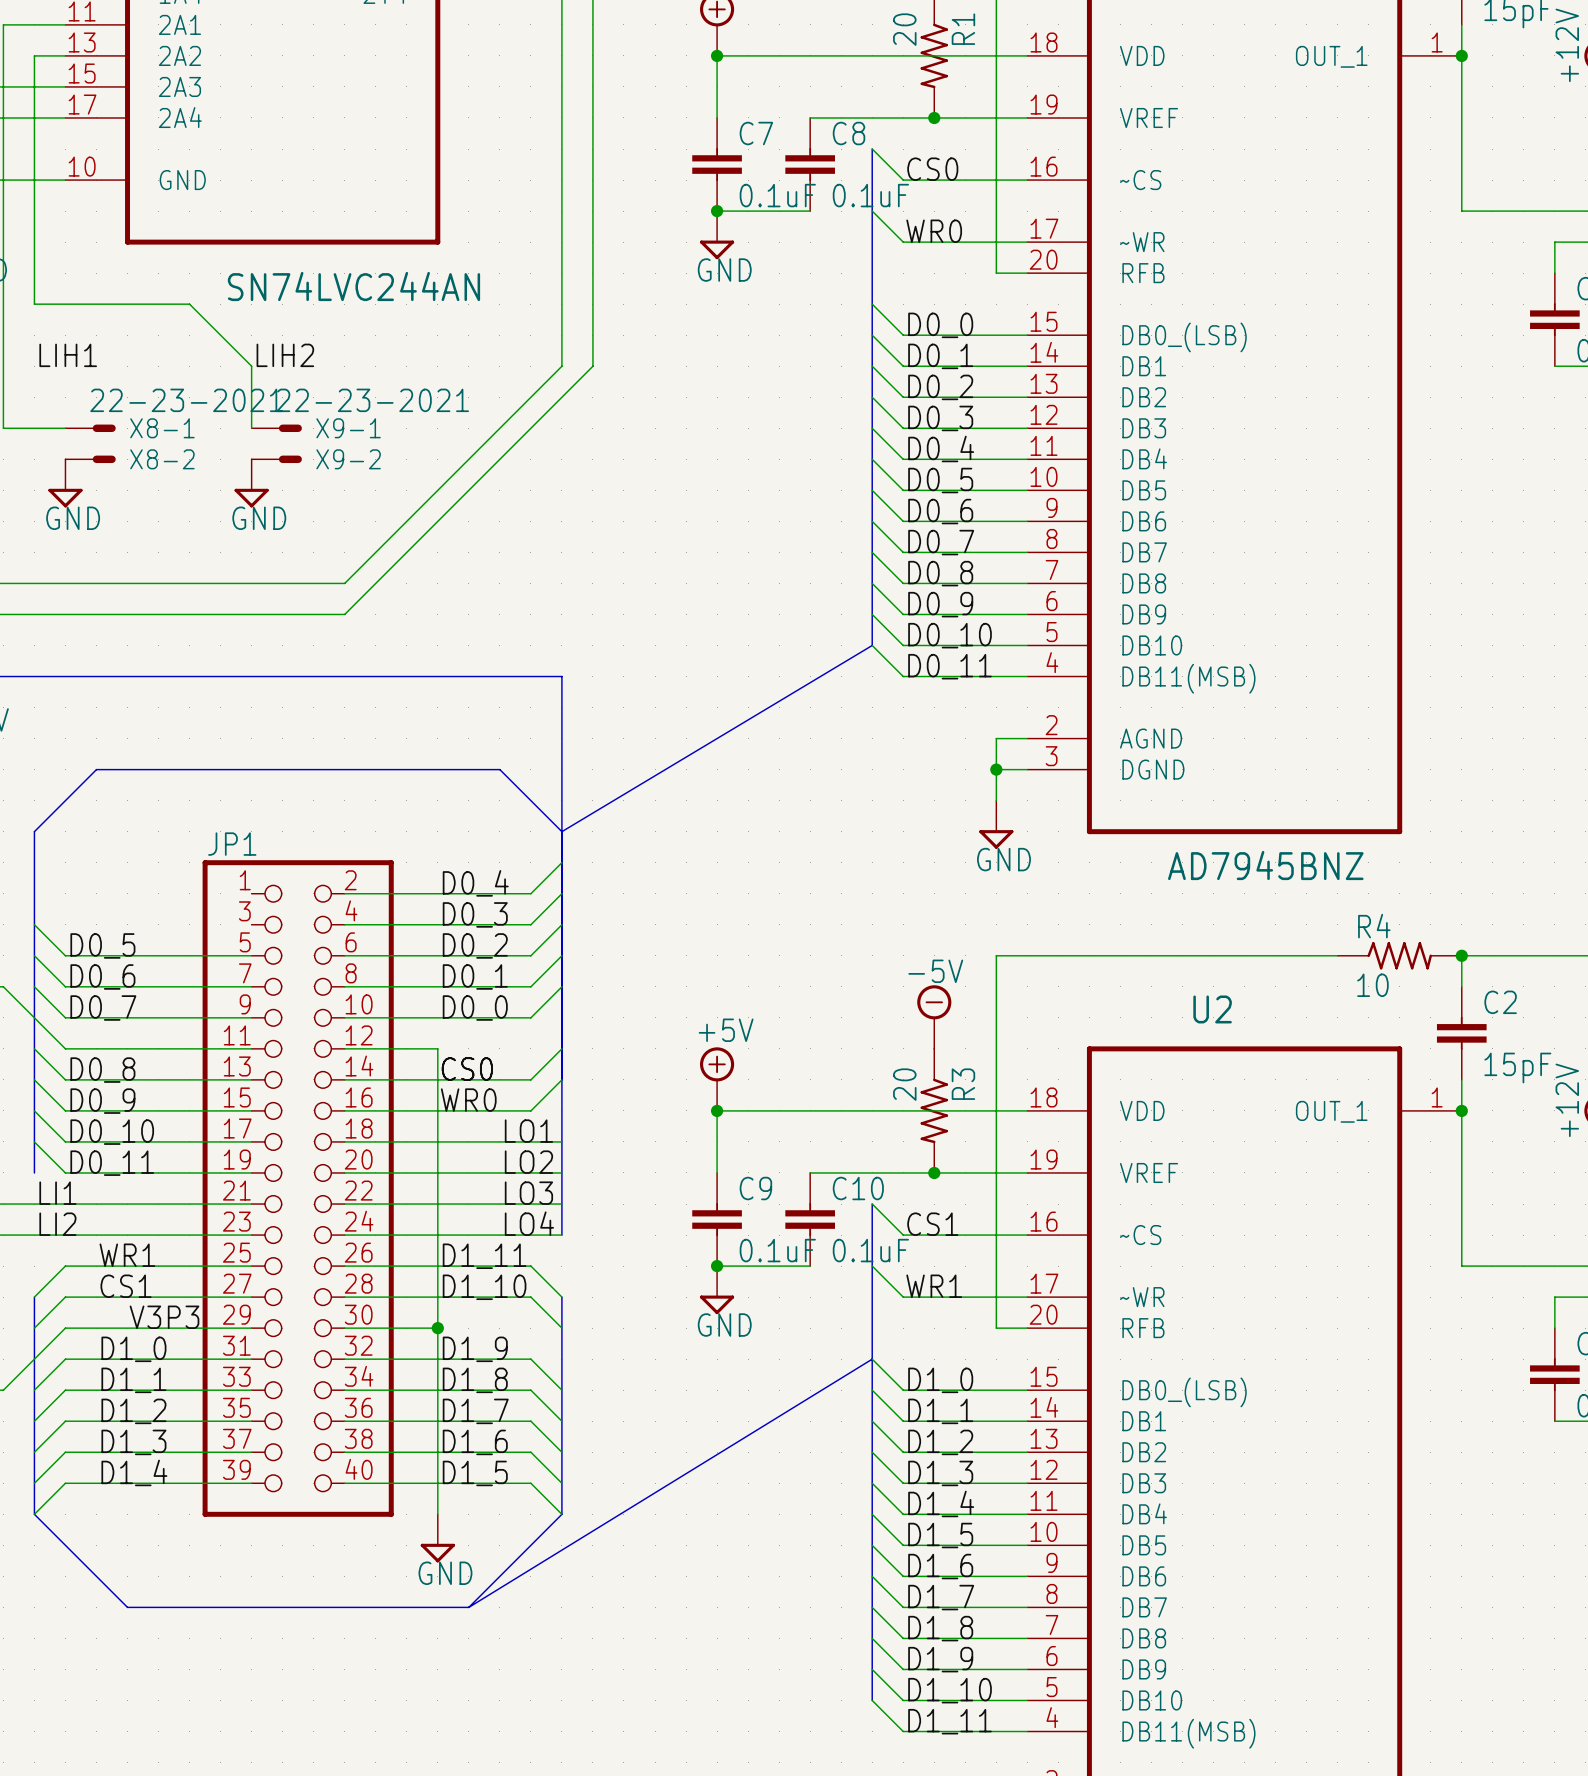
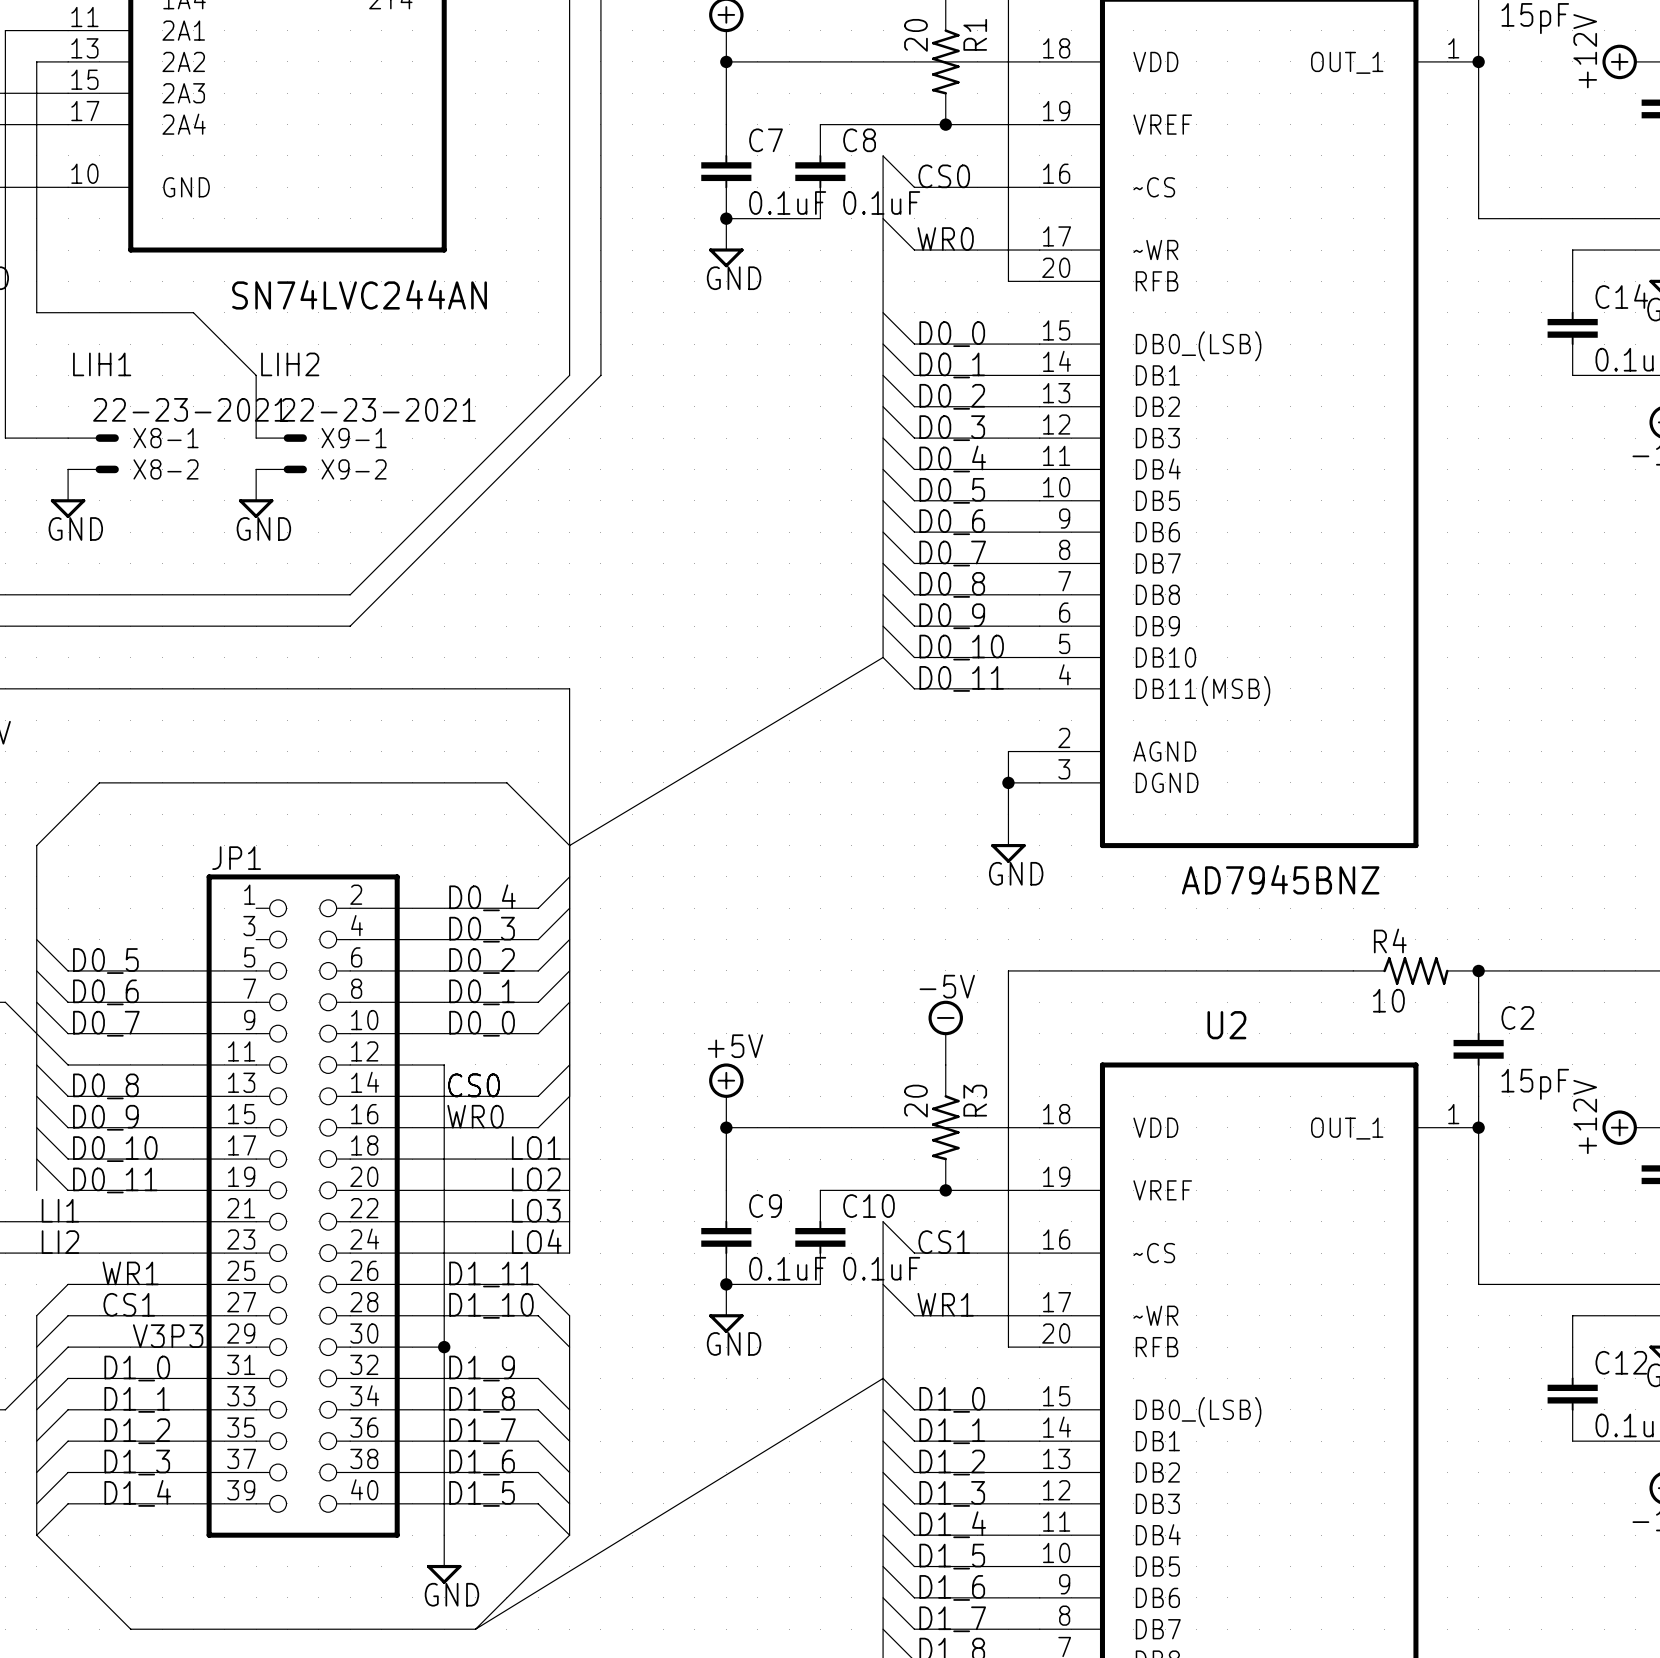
label position: LIH1 (68, 355) -> LIH1 (102, 364)

